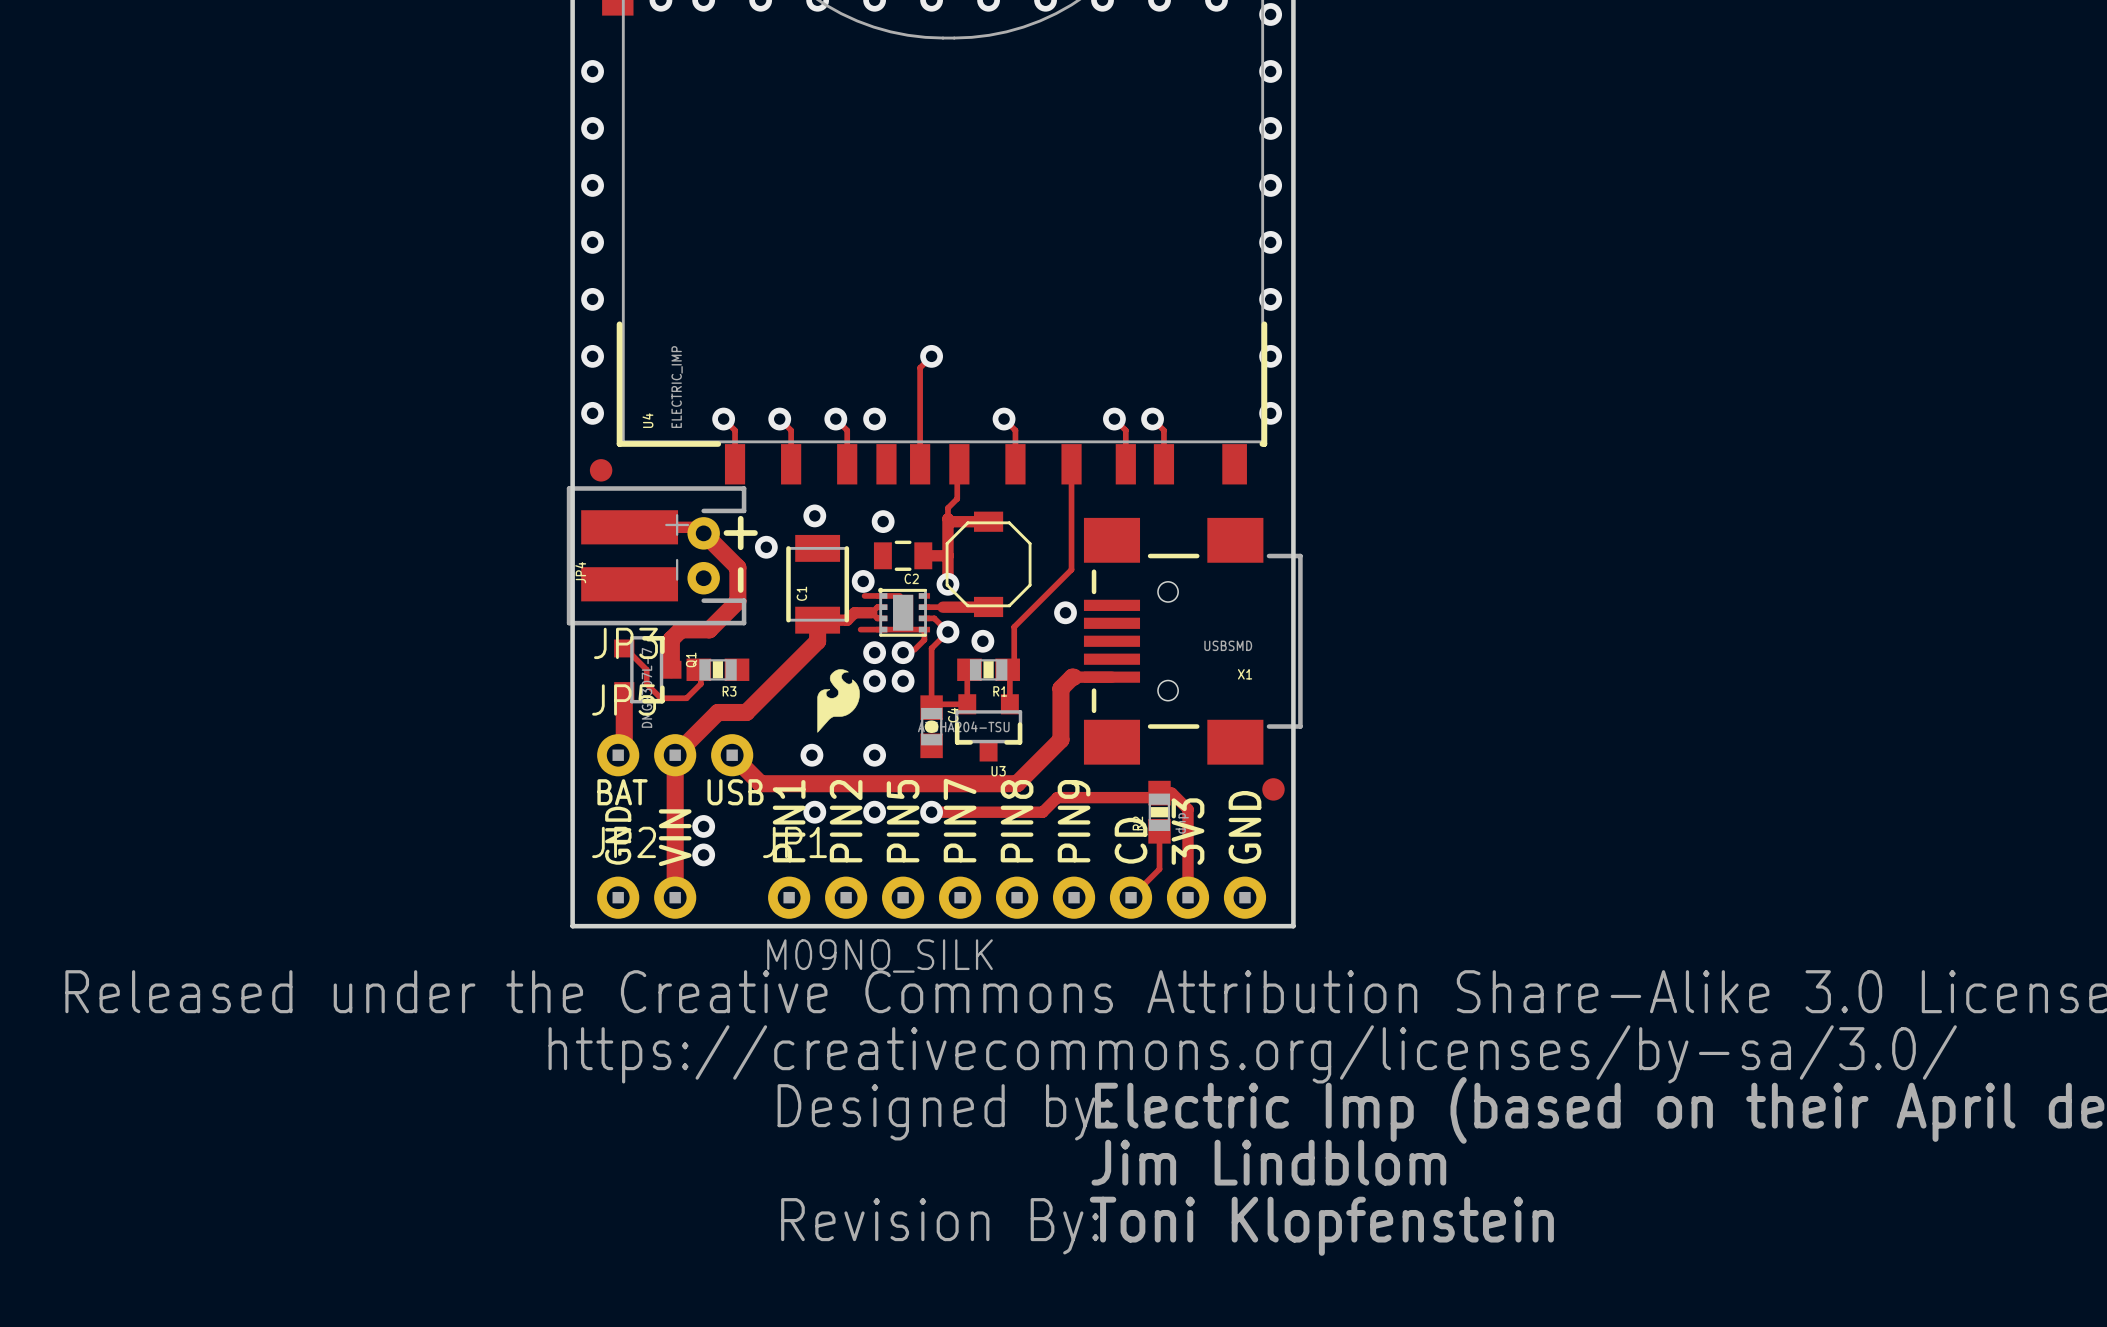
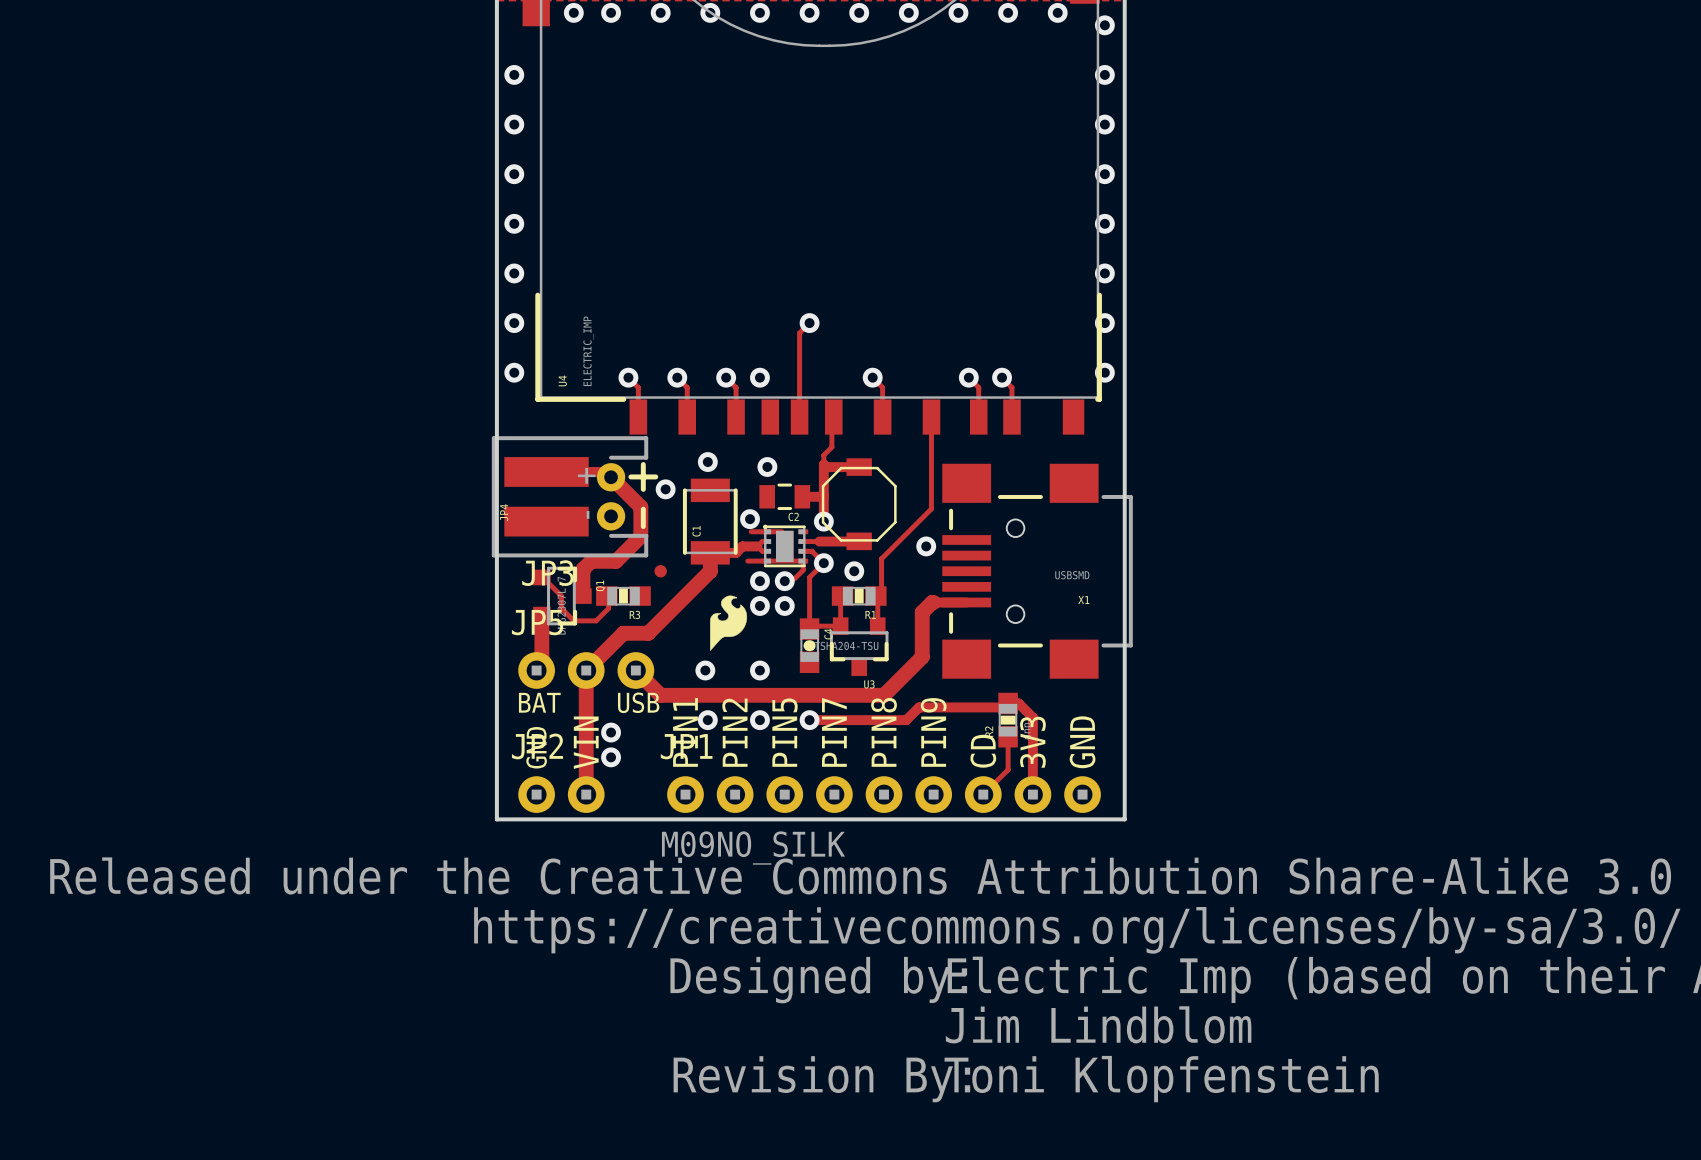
part: (601, 470) -> none
part: none -> (660, 571)
part: (1273, 789) -> none

